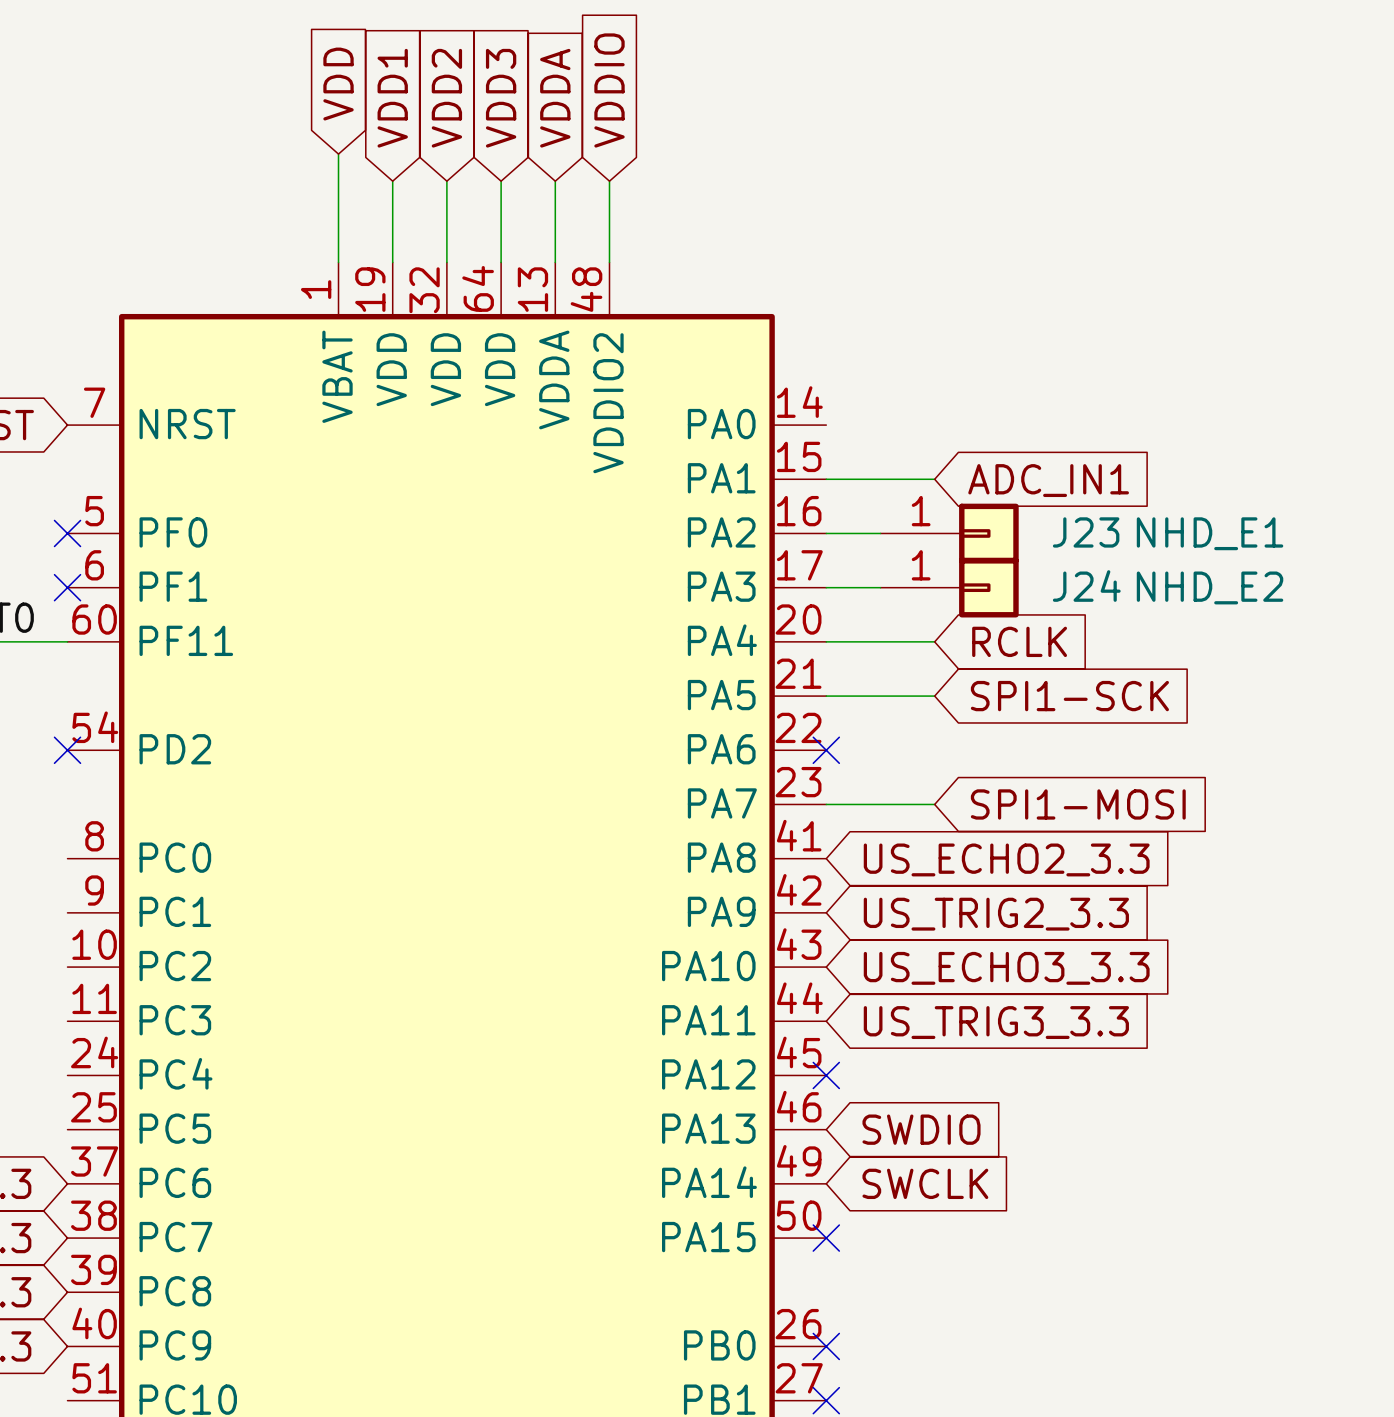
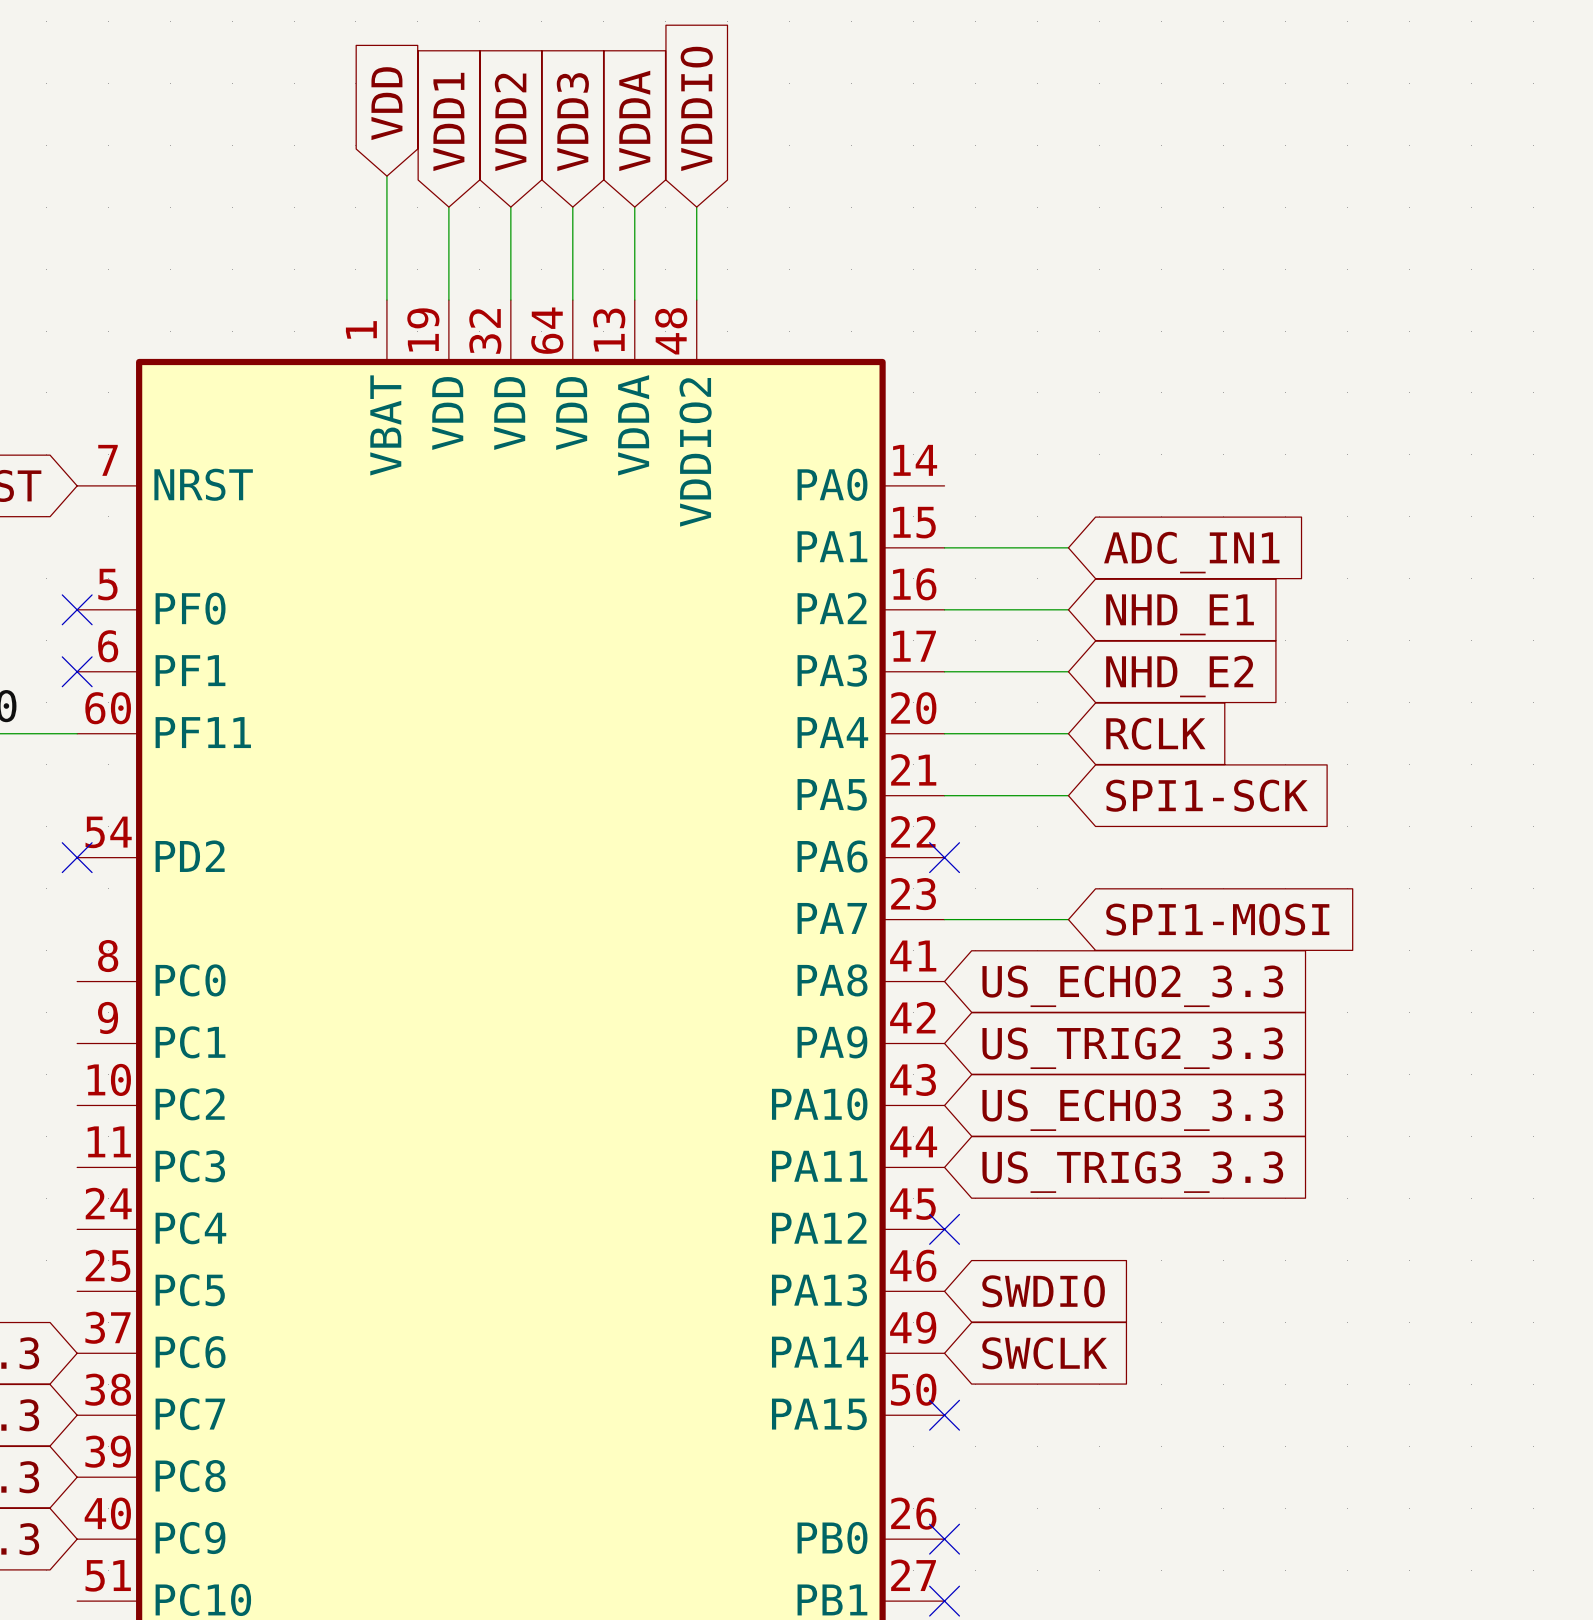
J23: NHD_E1 (949, 533) -> none
global label: none -> NHD_E1 (1180, 614)
J24: NHD_E2 (949, 587) -> none
global label: none -> NHD_E2 (1179, 676)

